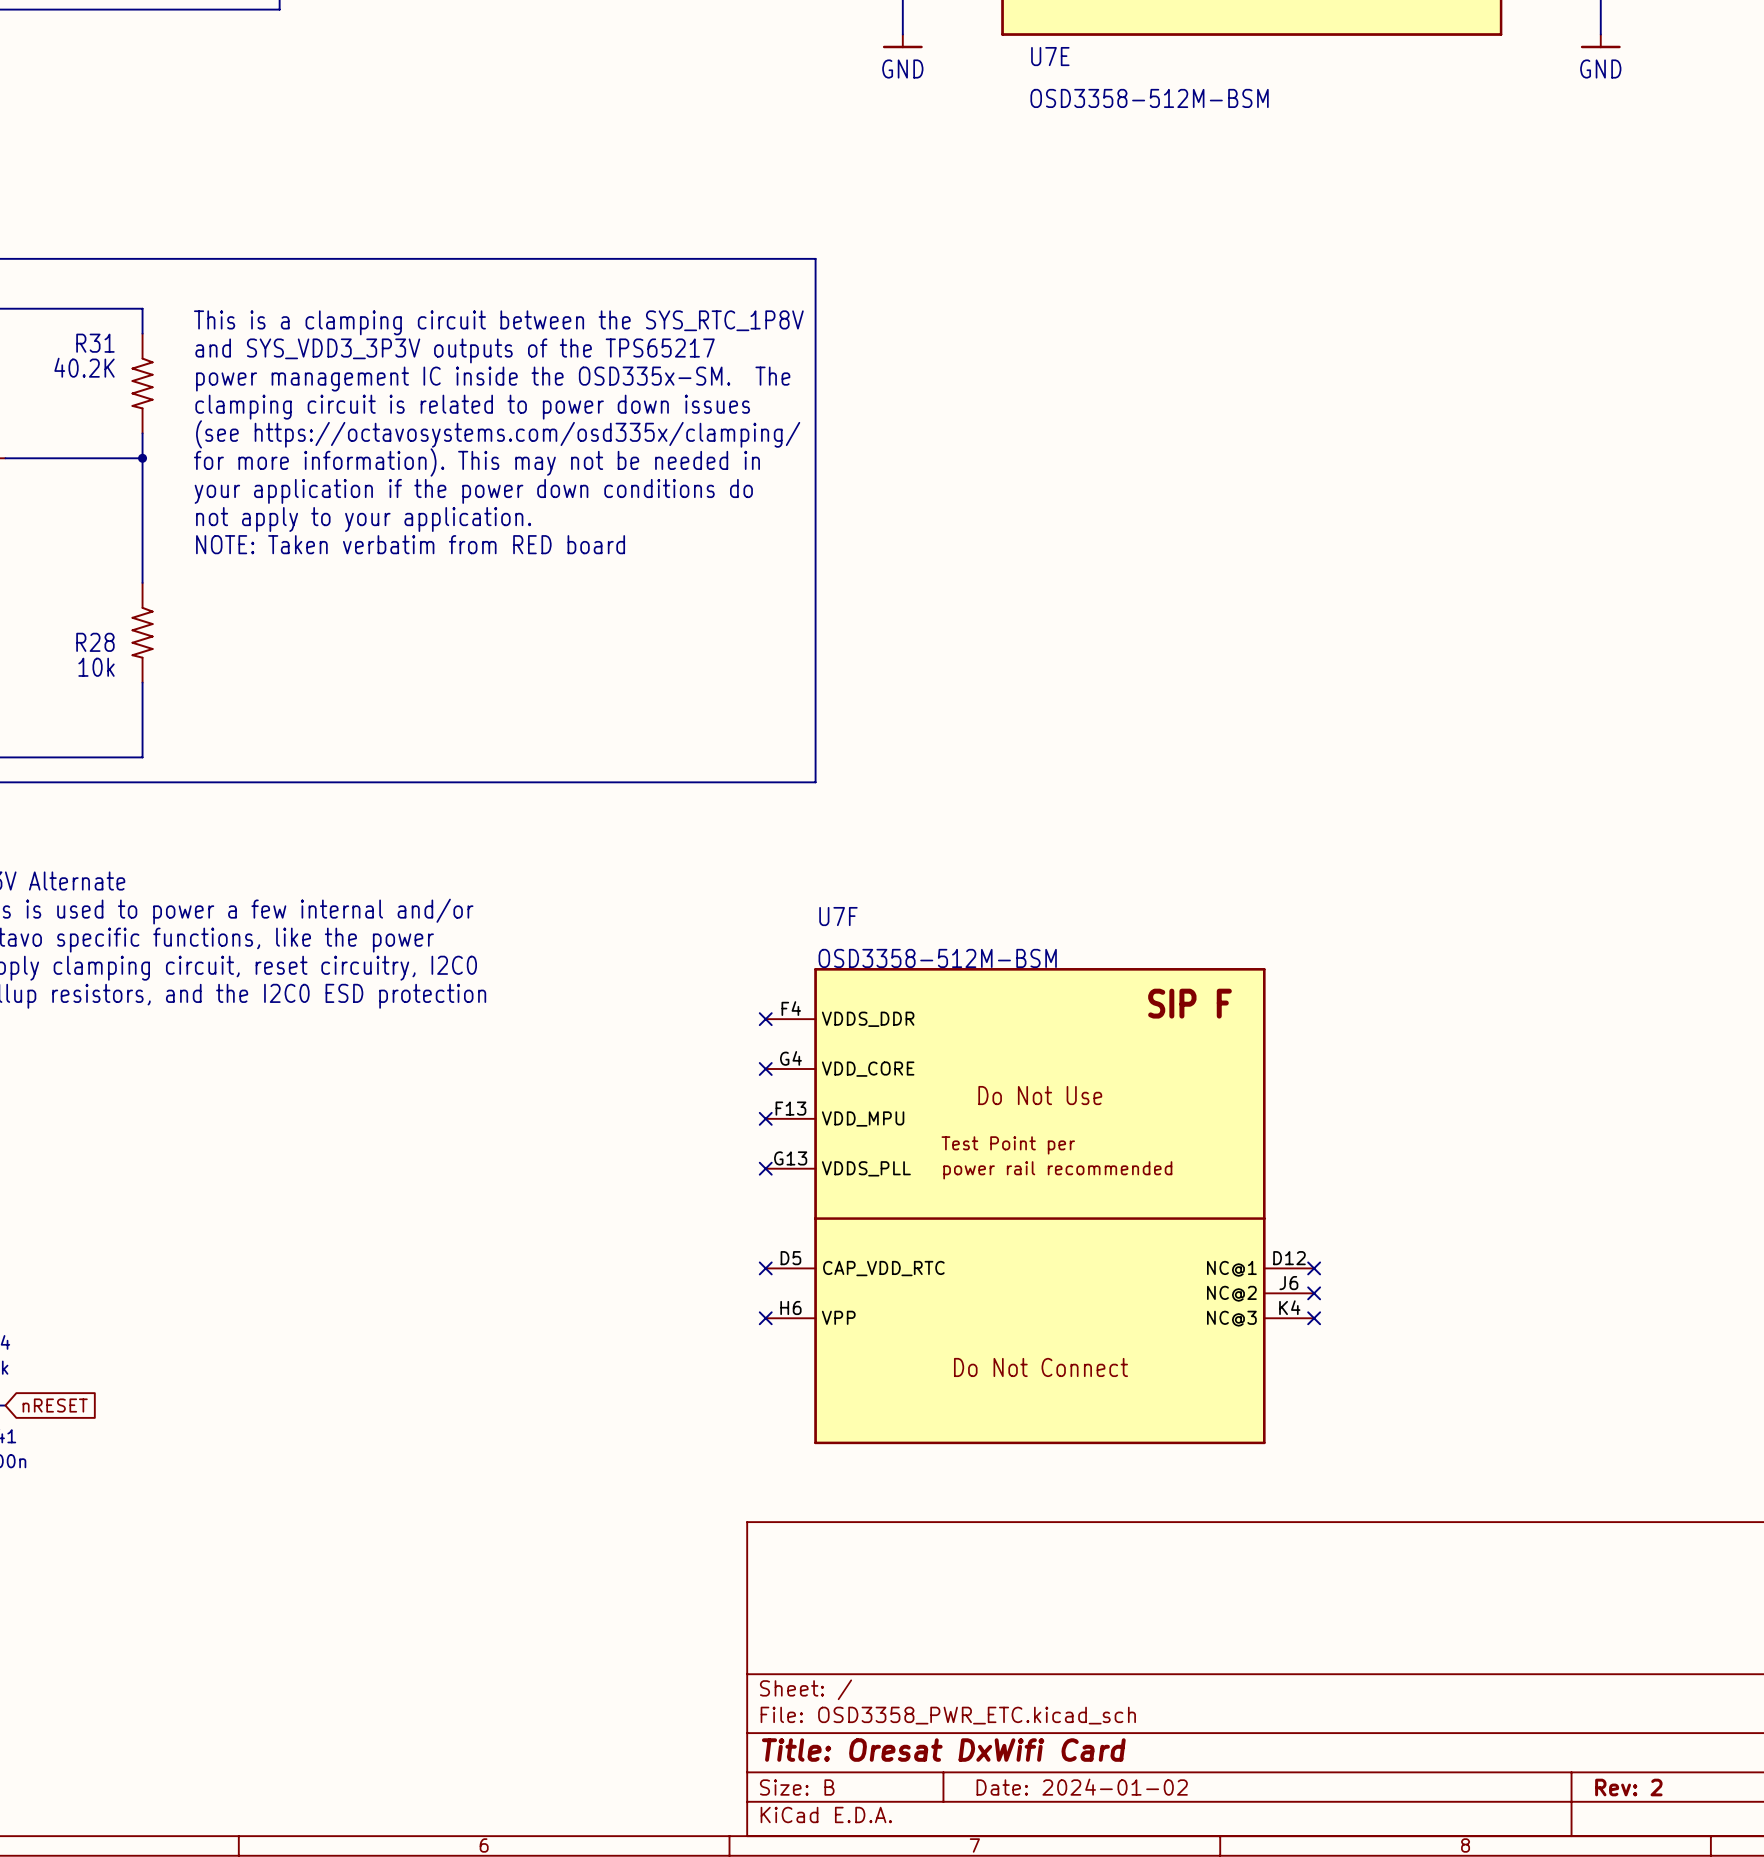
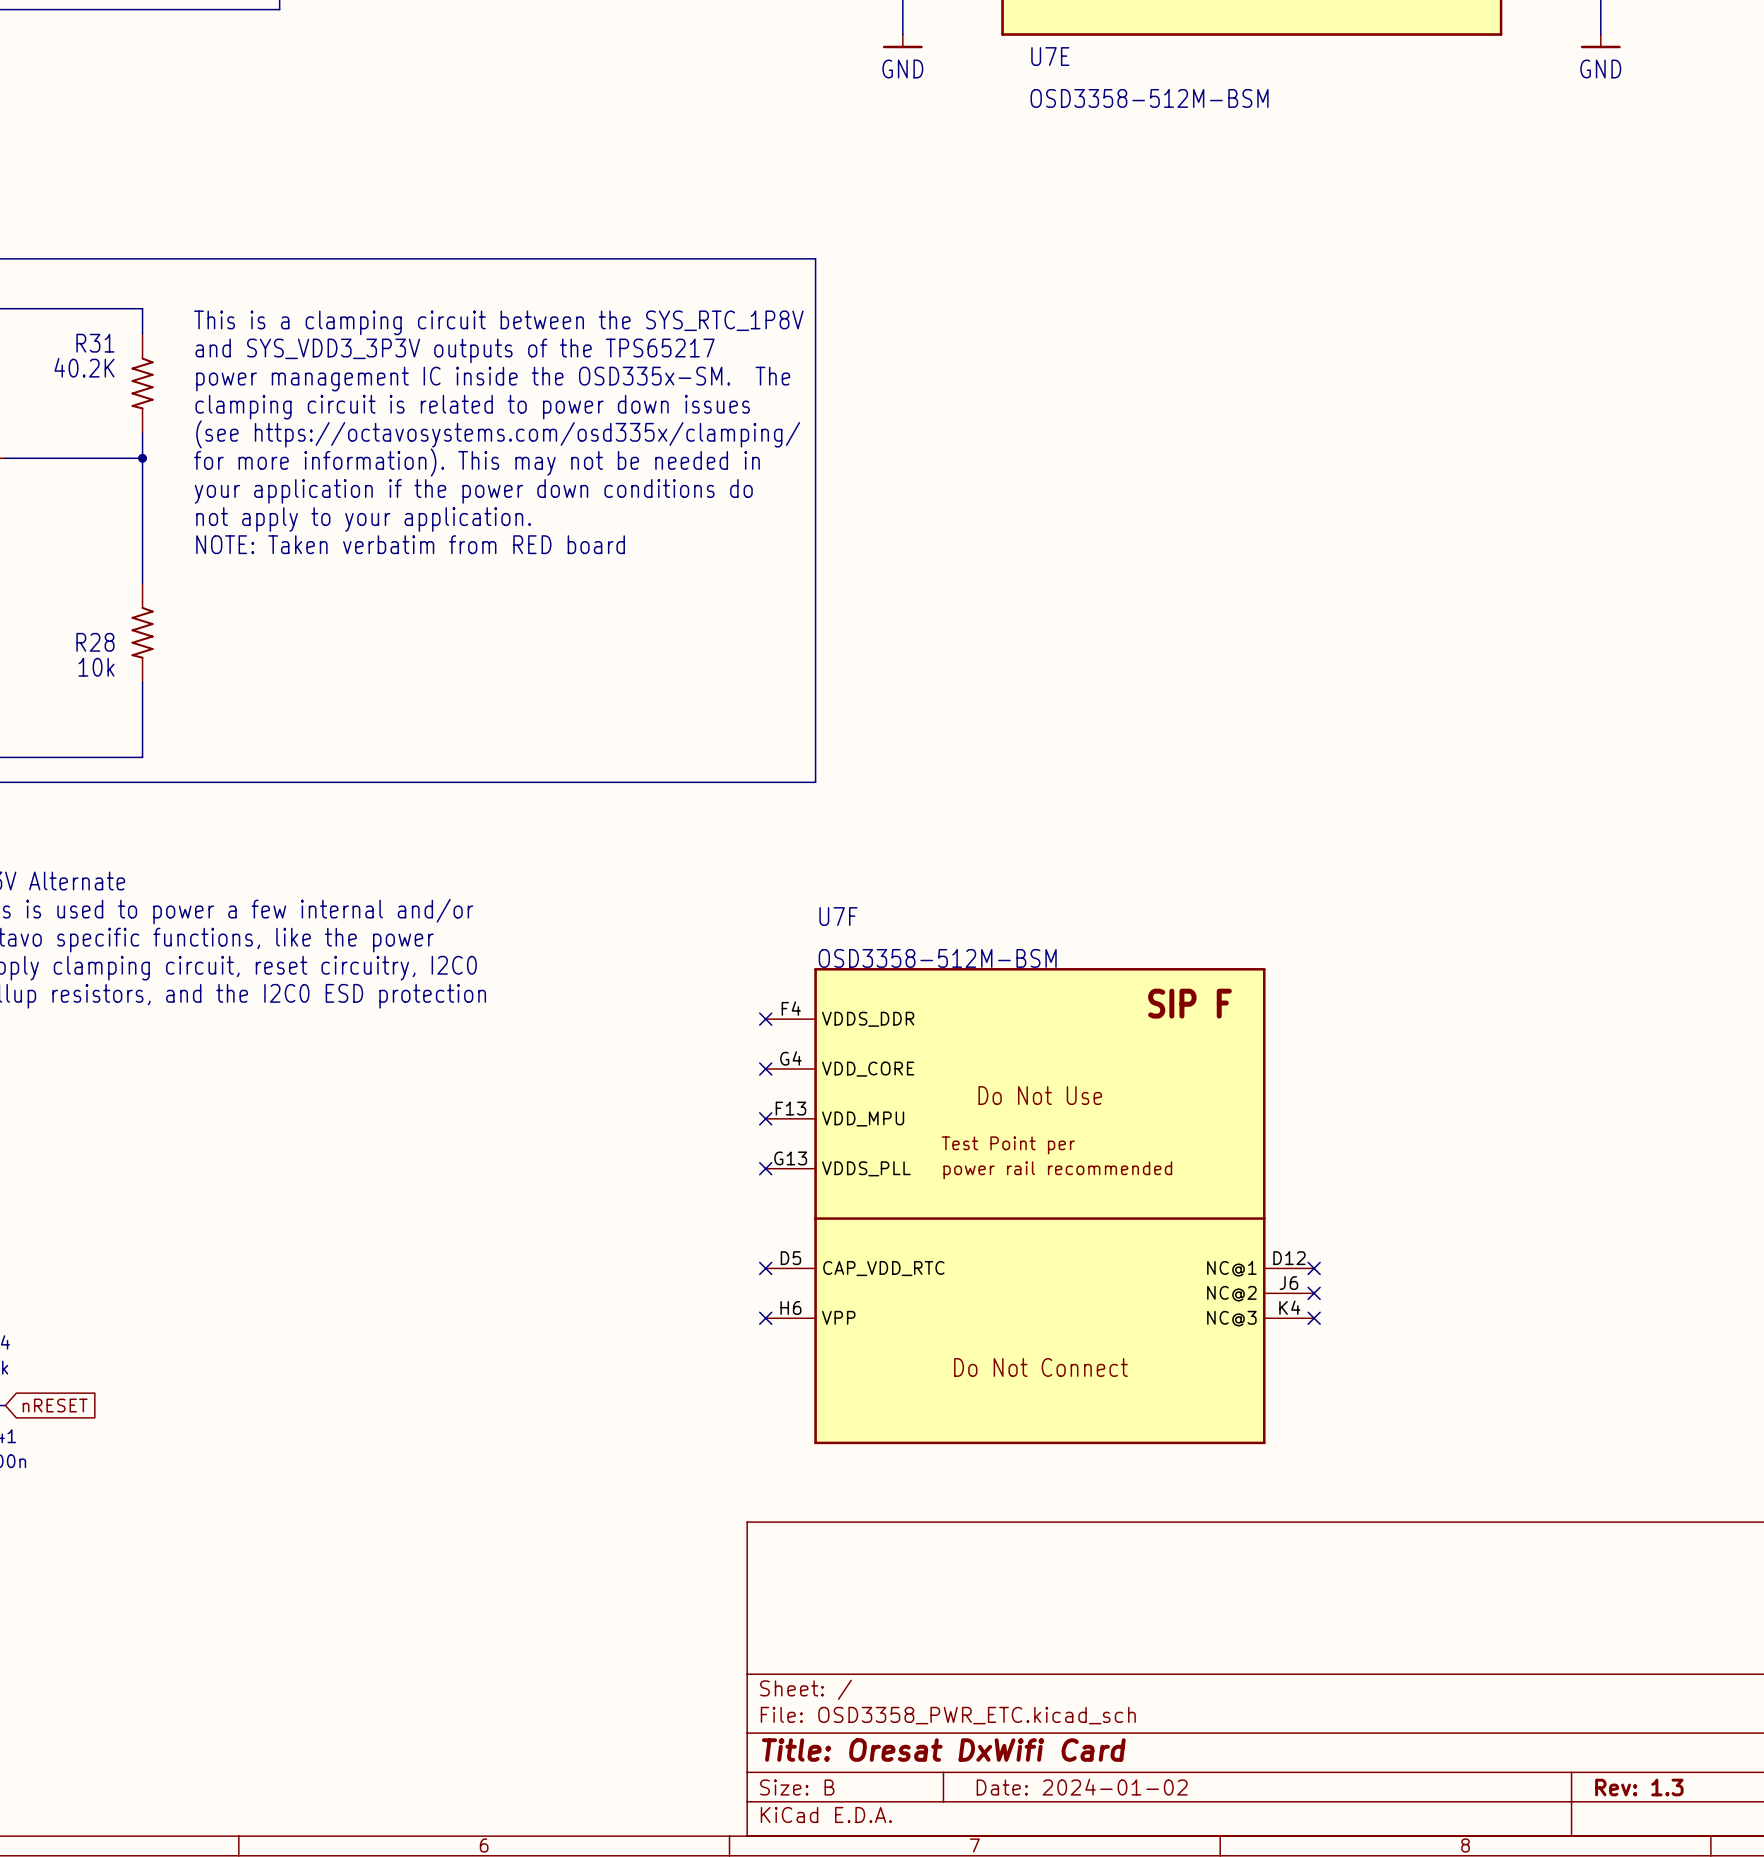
title block: Rev: 2 (1628, 1787) -> Rev: 1.3 (1639, 1787)

